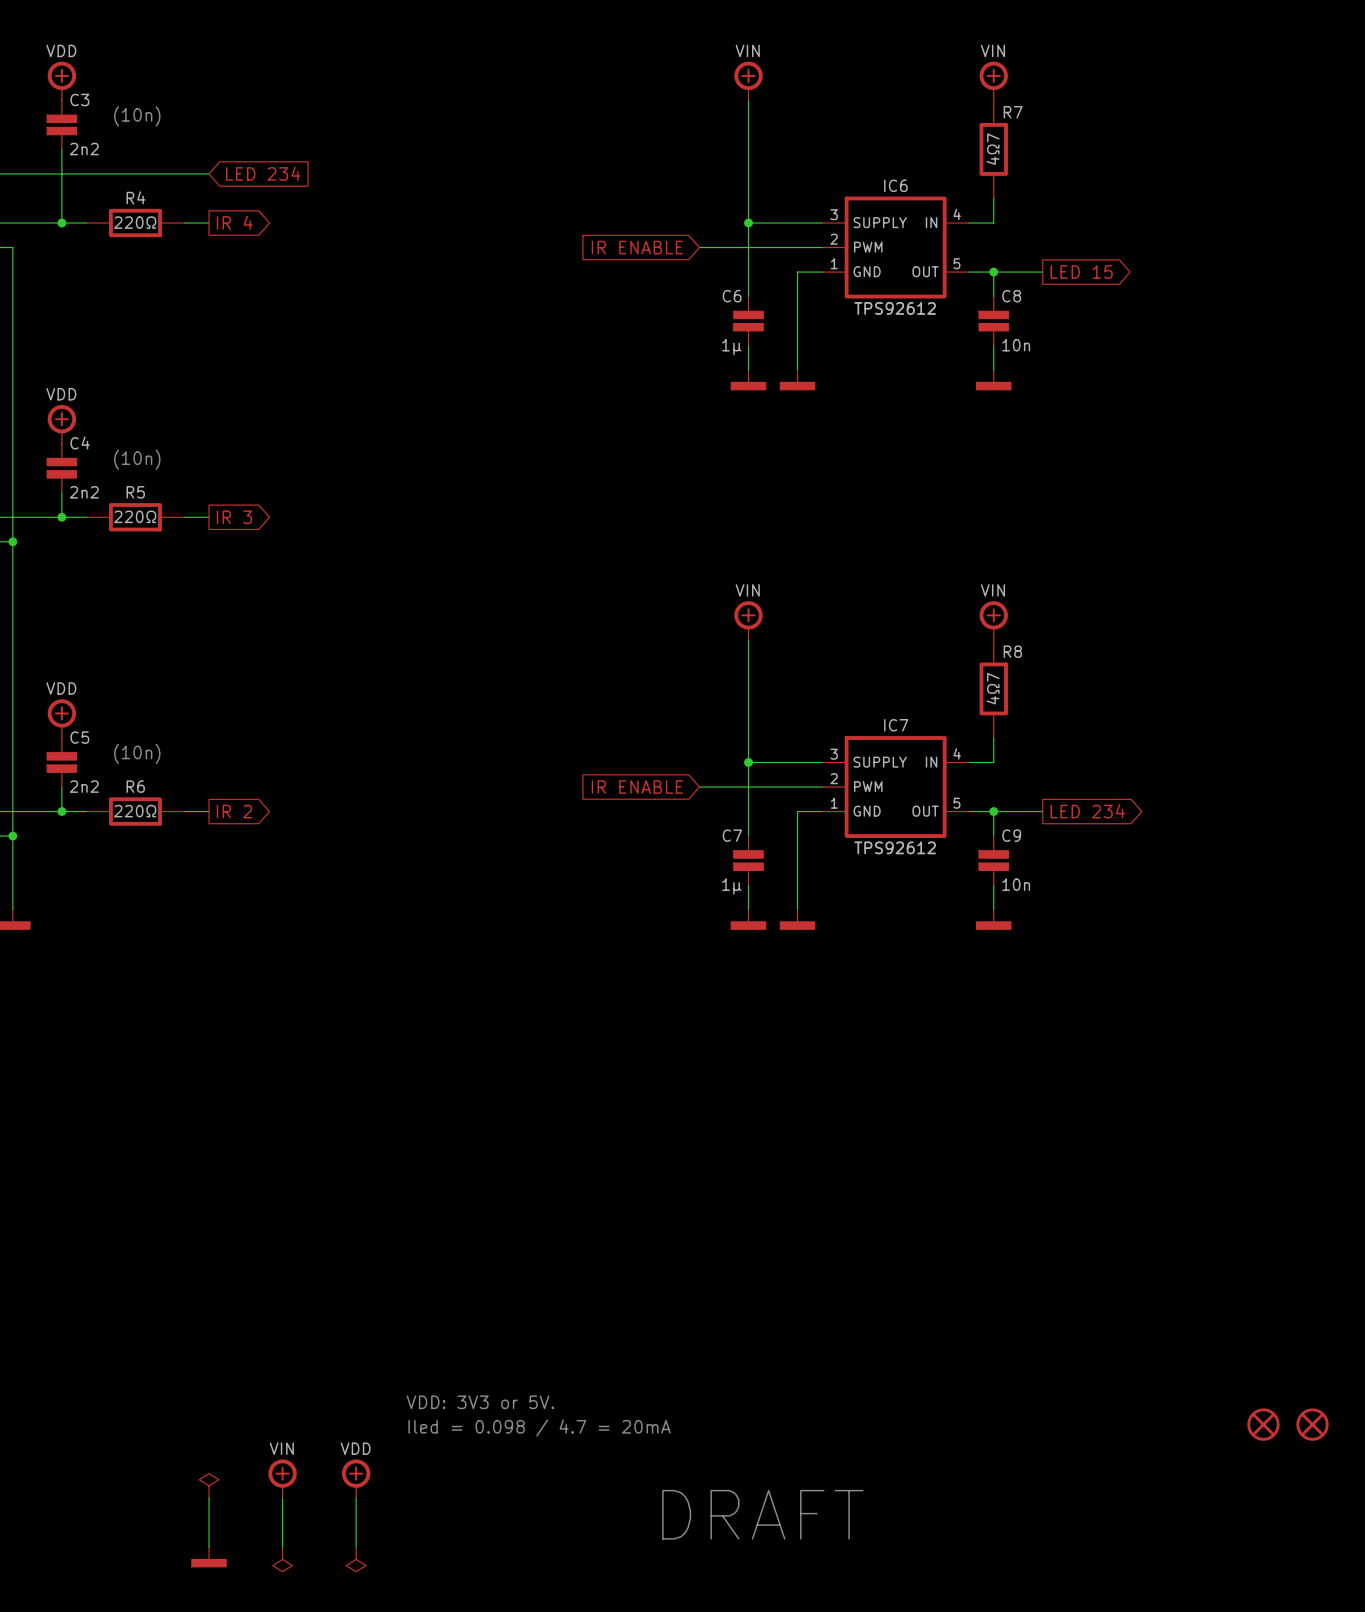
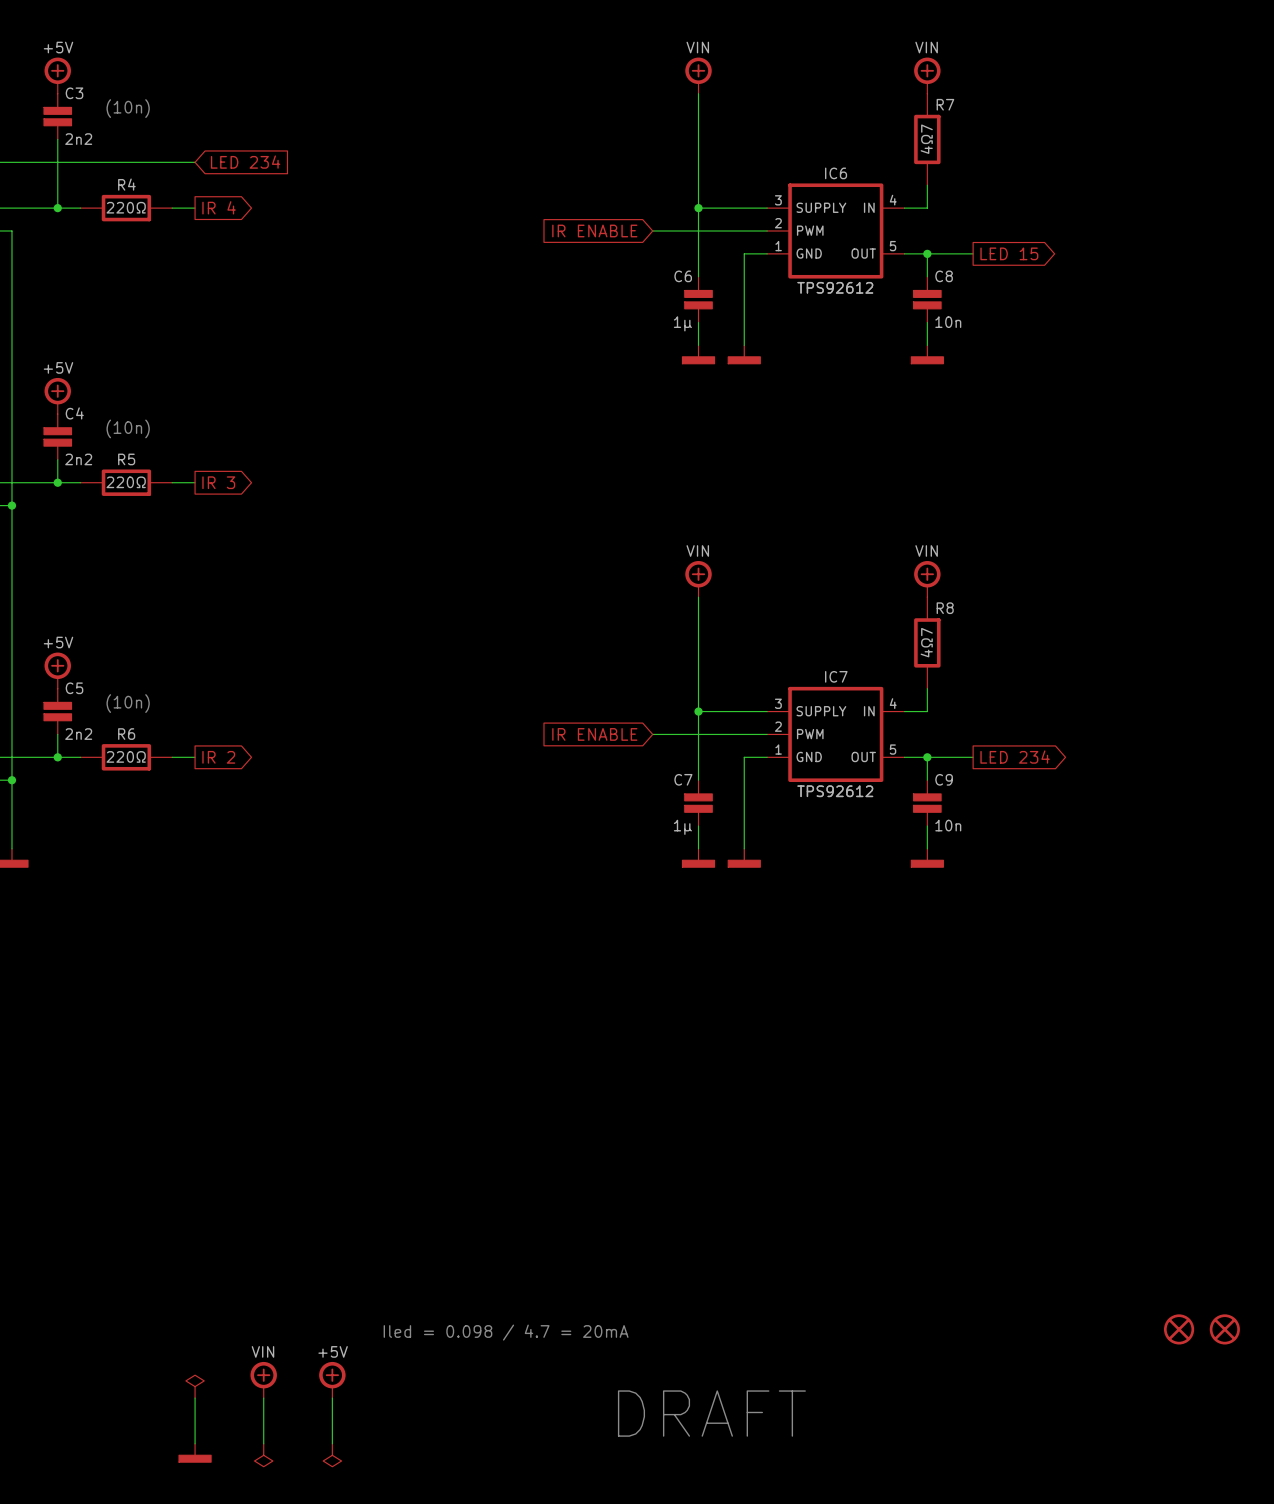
power symbol text: VDD (61, 50) -> +5V (58, 47)
power symbol text: VDD (61, 394) -> +5V (58, 367)
power symbol text: VDD (61, 688) -> +5V (58, 642)
text: VDD: 3V3 or 5V. (480, 1402) -> none
text: Iled = 0.098 / 4.7 = 20mA (539, 1427) -> none
text: none -> Iled = 0.098 / 4.7 = 20mA (506, 1332)
power symbol text: VDD (355, 1448) -> +5V (333, 1351)

